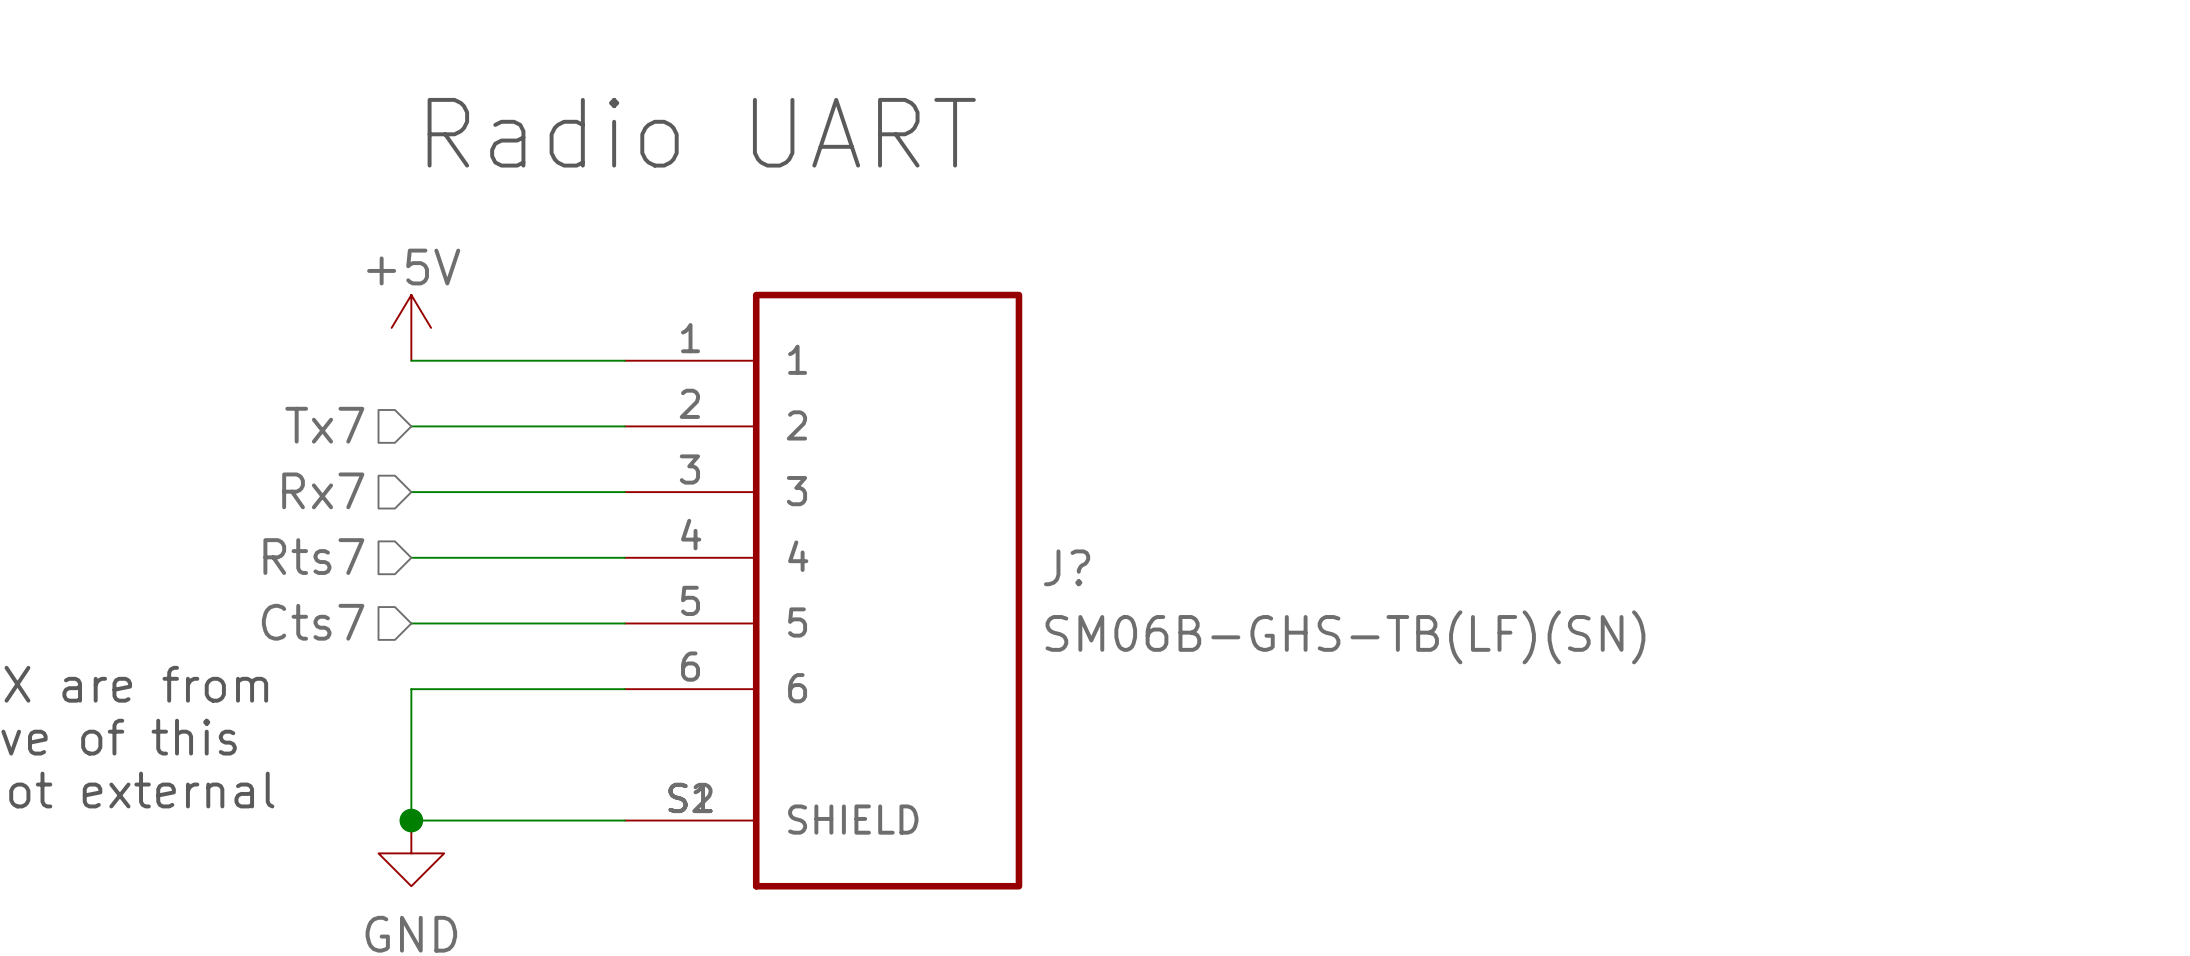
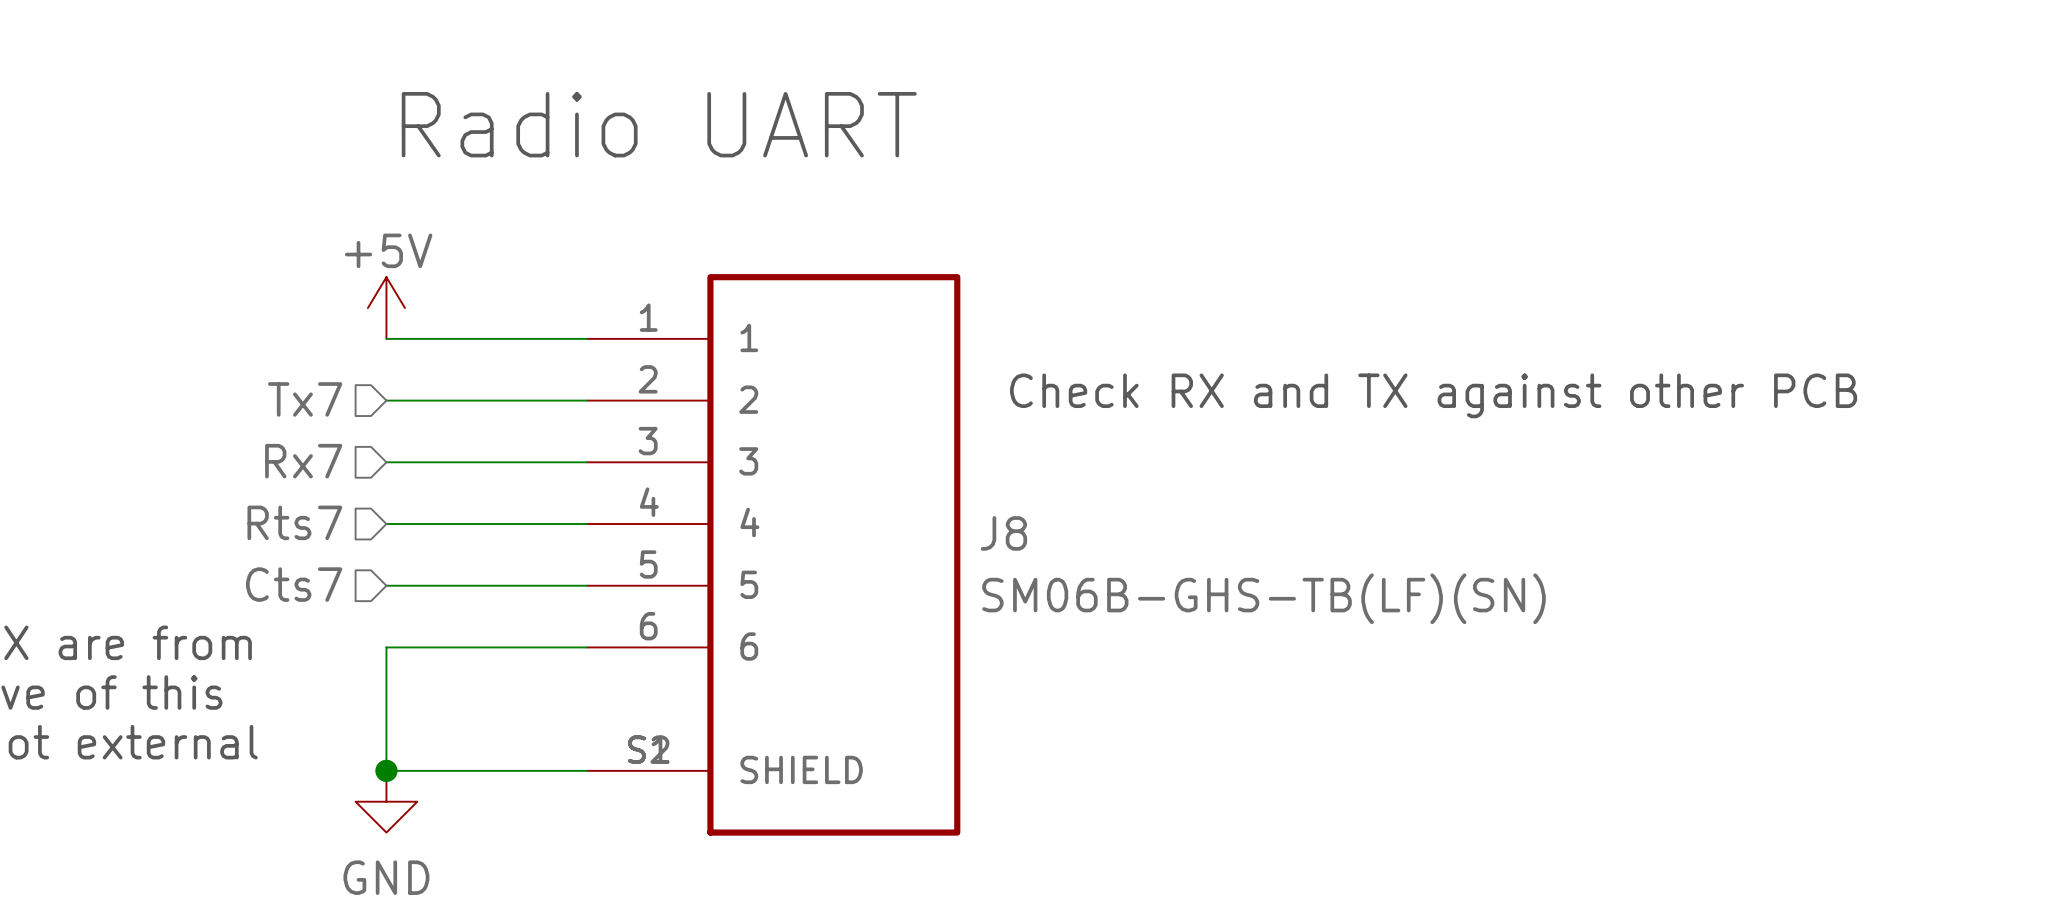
text: none -> Check RX and TX against other PCB (1433, 395)
J? name: J? (1067, 567) -> J8 (1003, 533)

